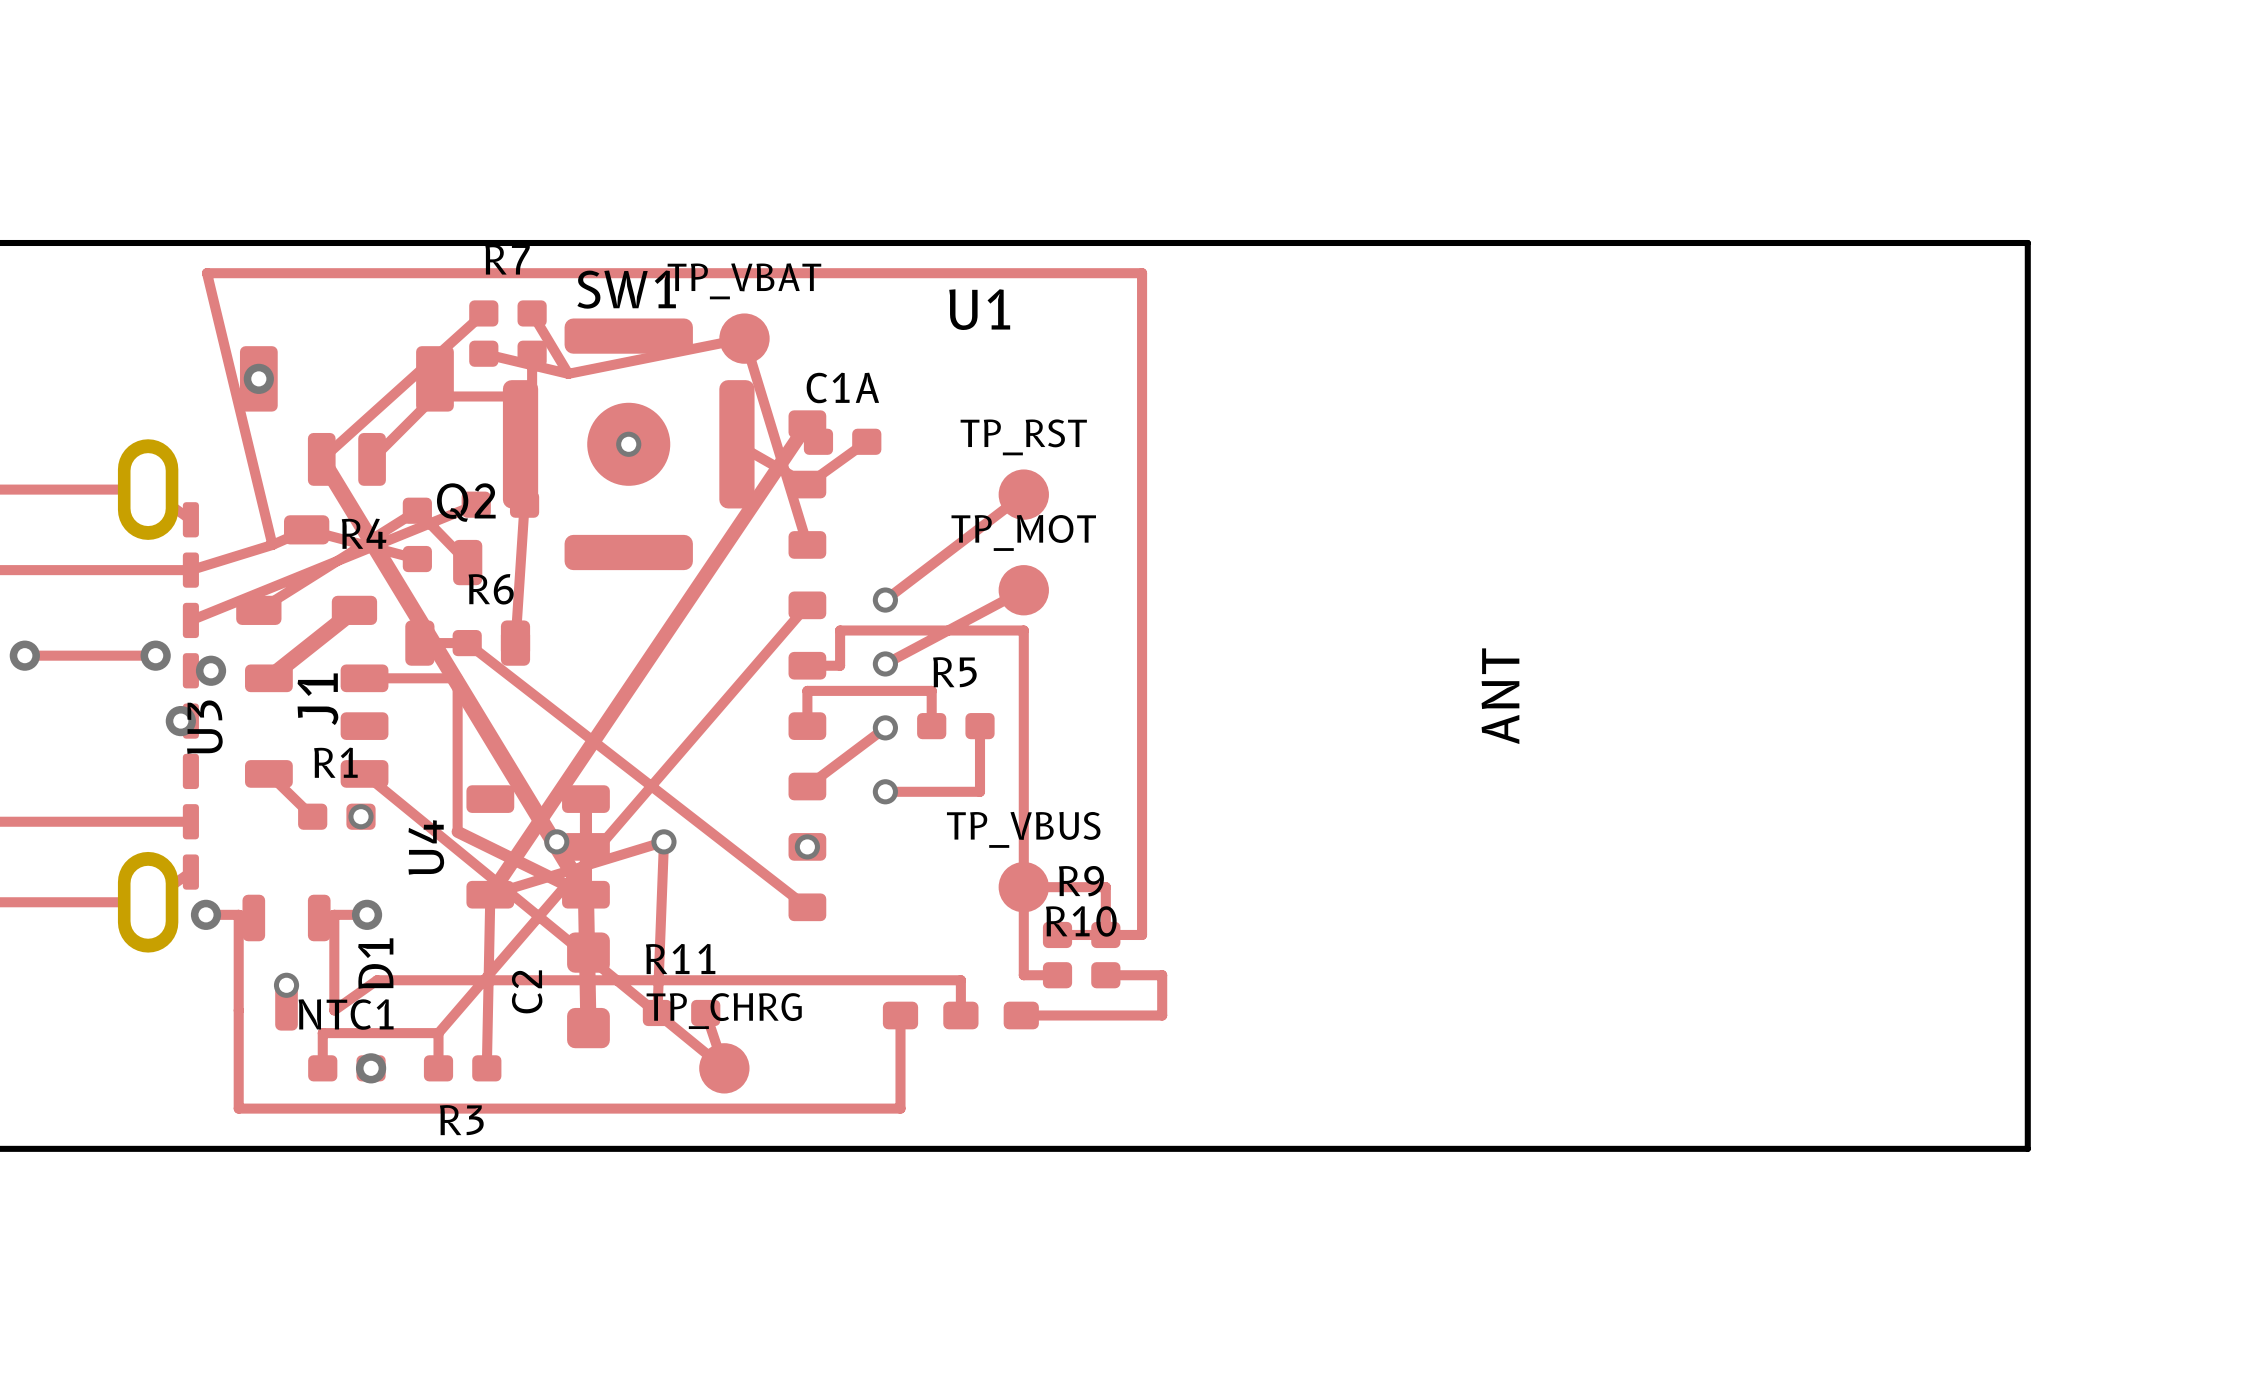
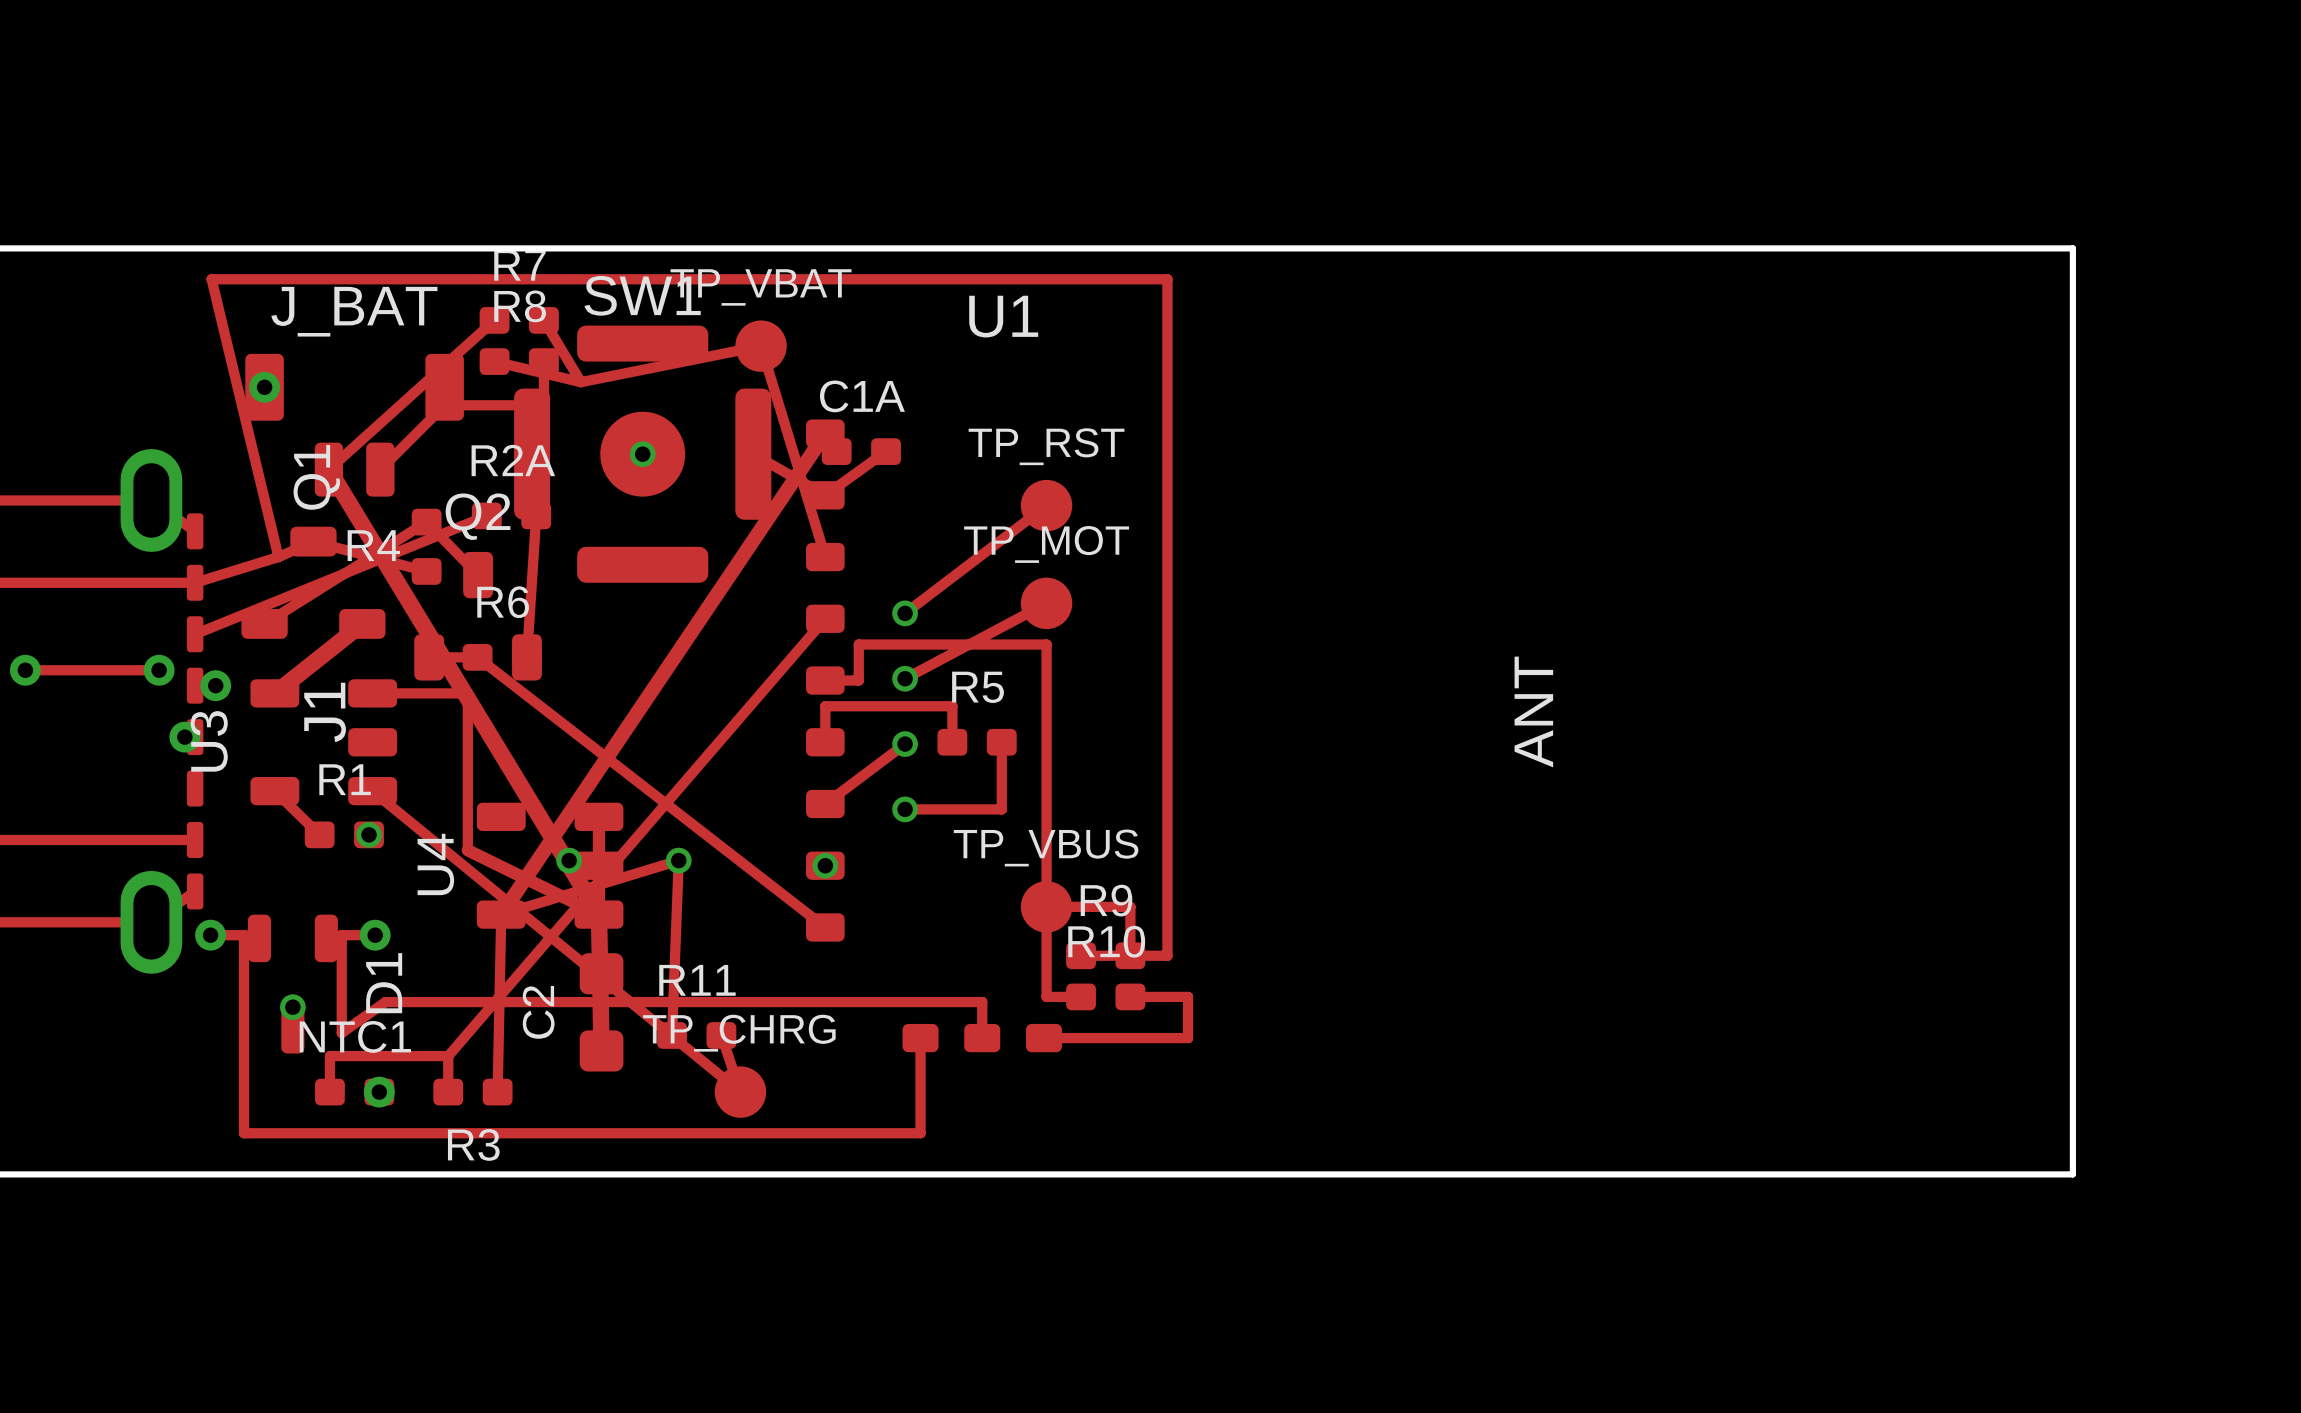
R8 name: none -> R8 (520, 306)
J_BAT name: none -> J_BAT (354, 311)
R2A name: none -> R2A (513, 460)
Q1 name: none -> Q1 (316, 477)

